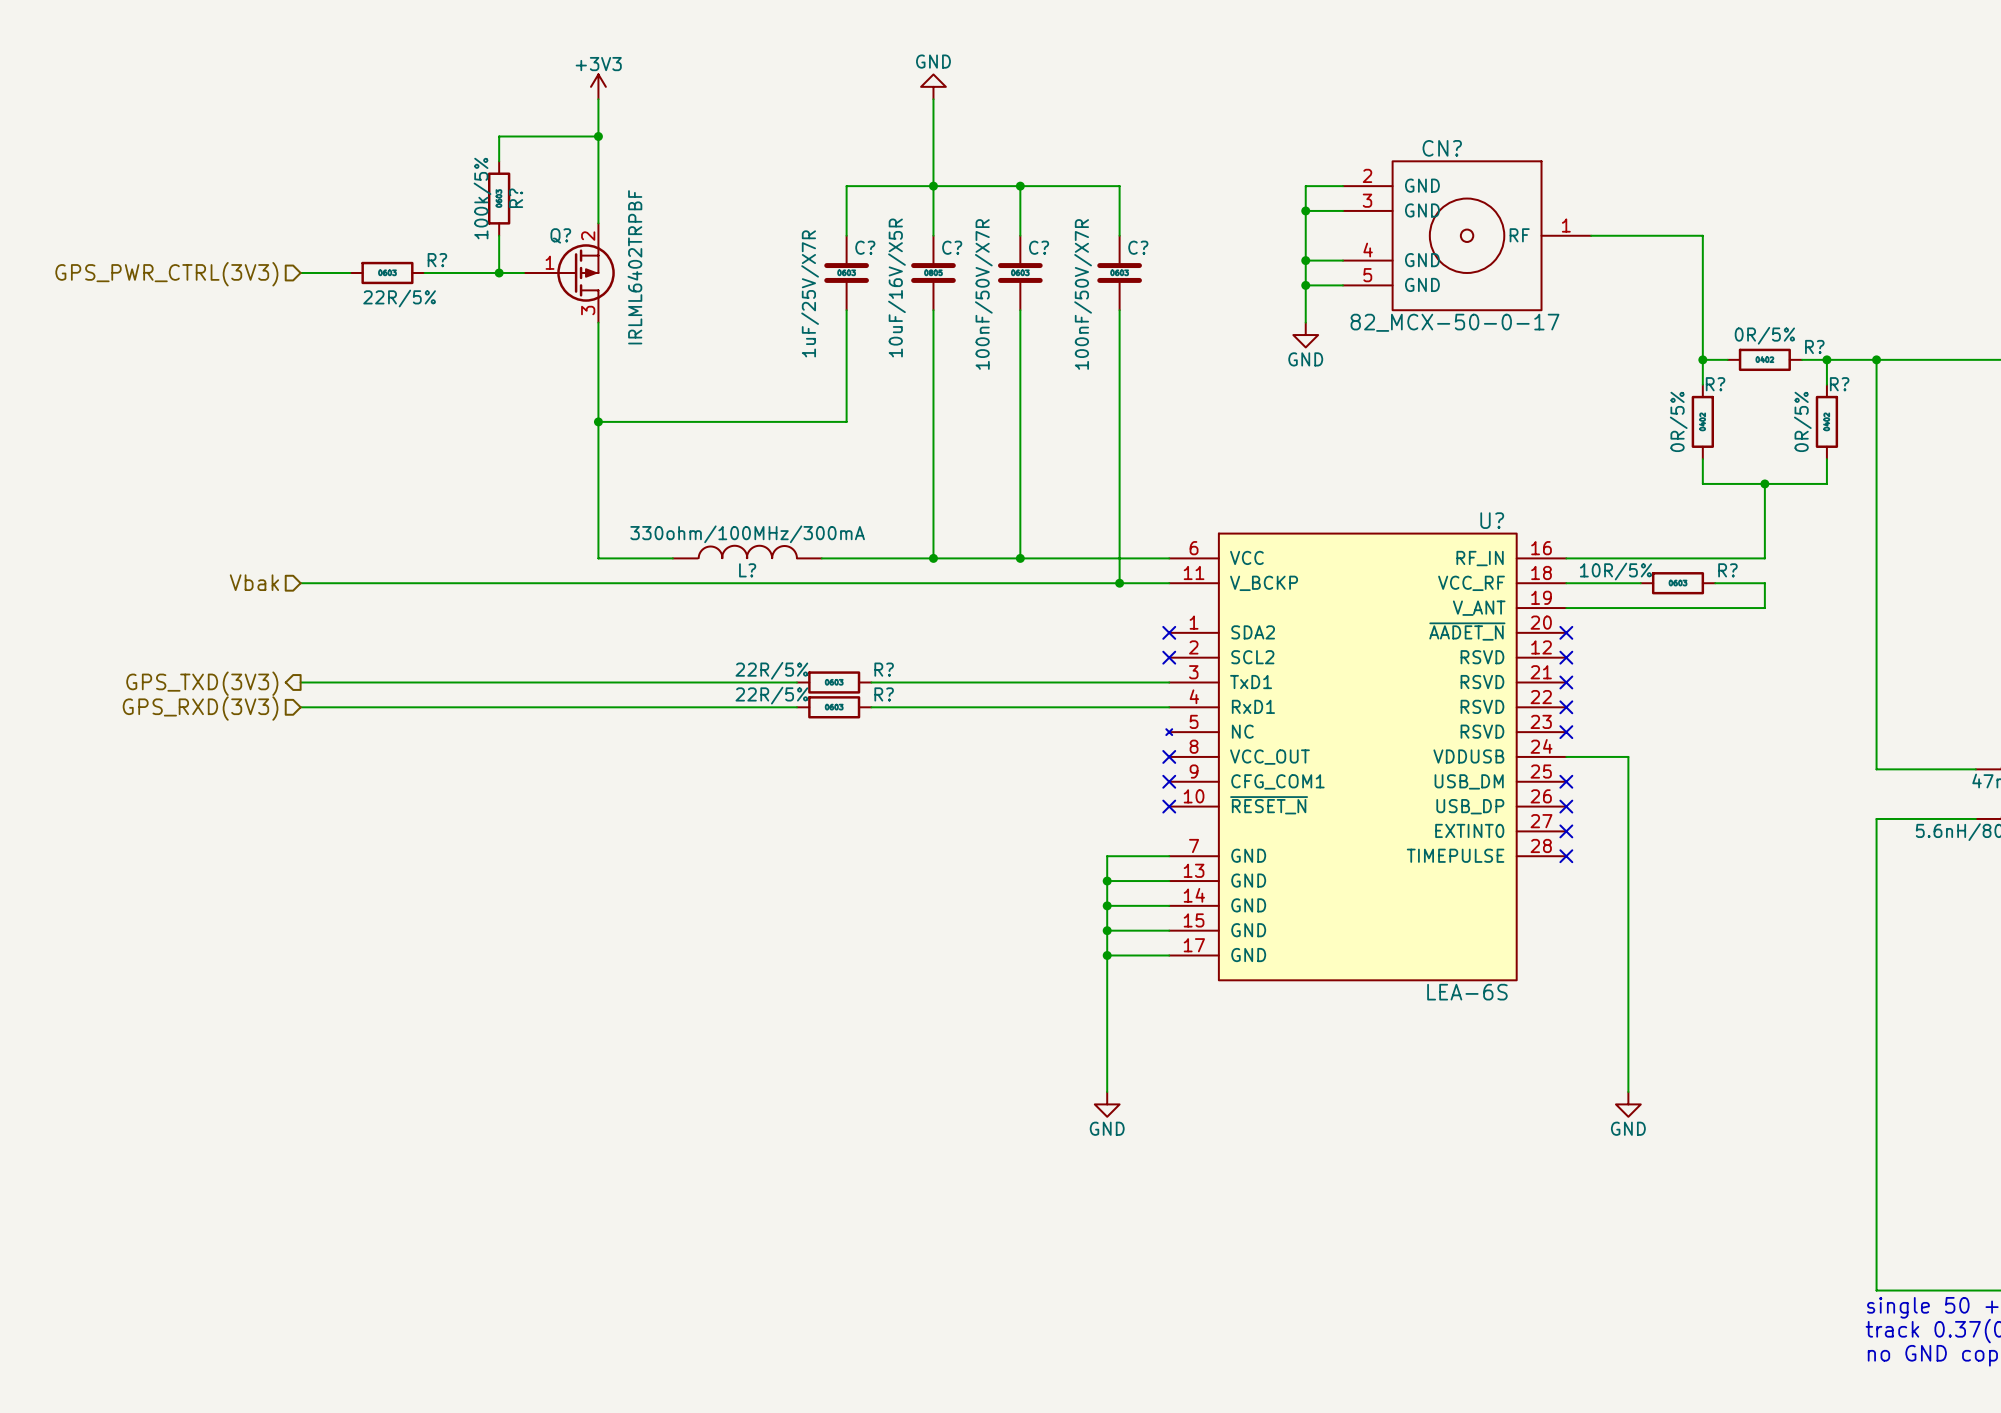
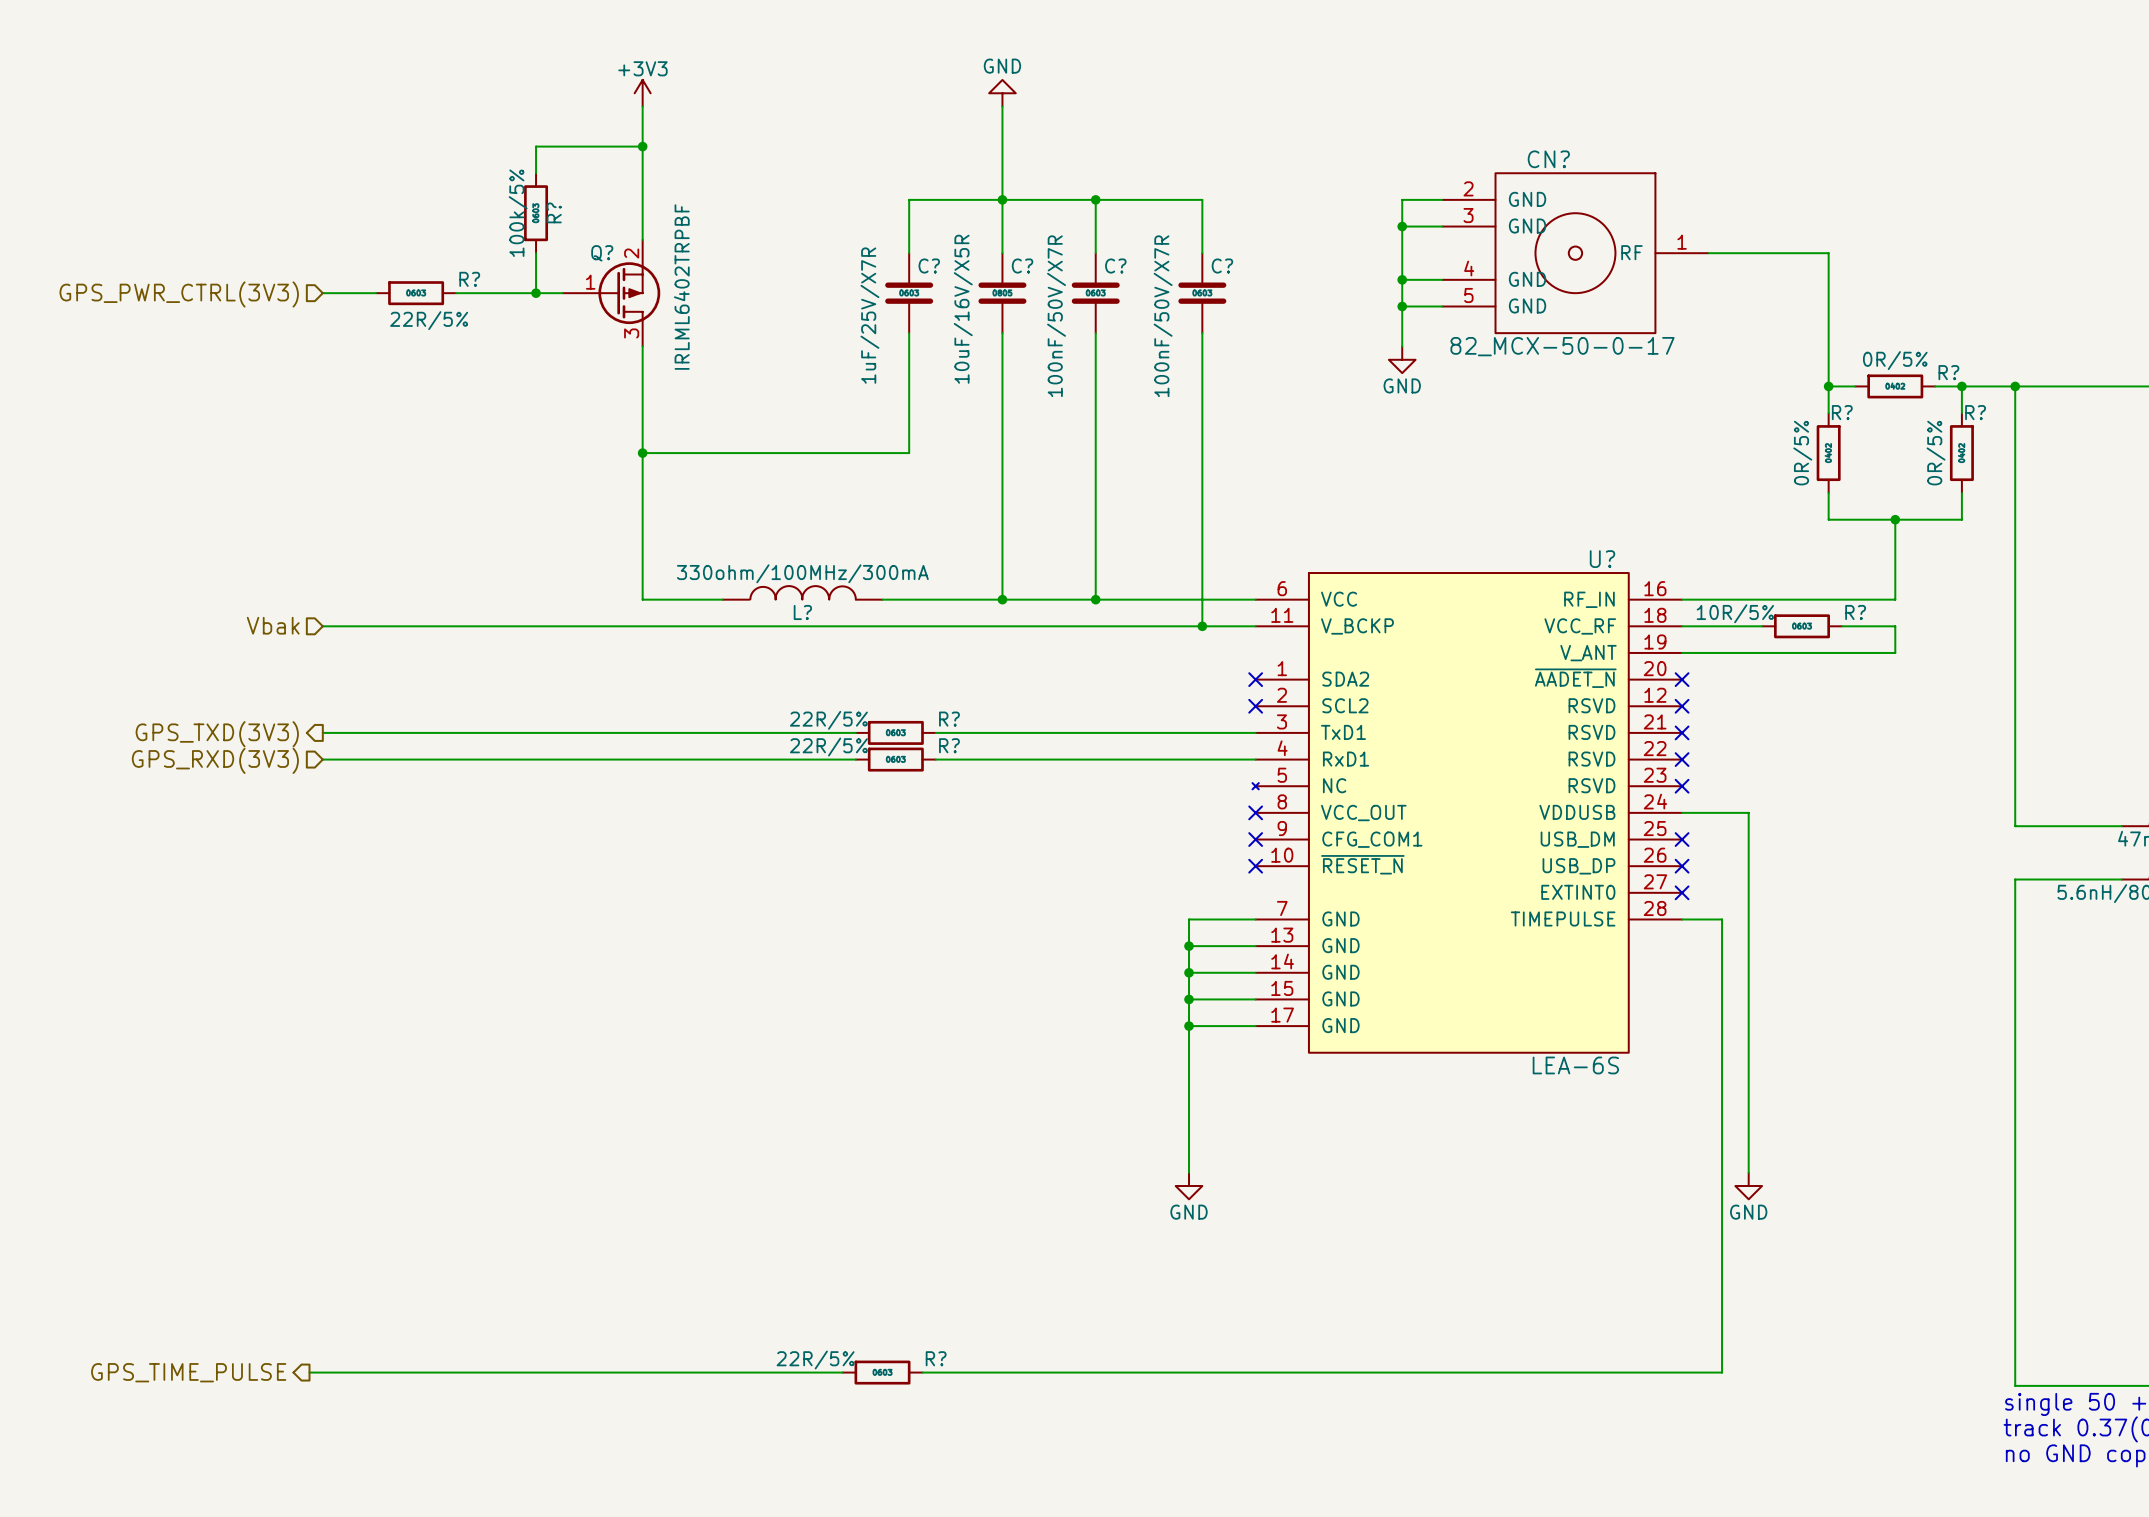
wire: none -> (1682, 919) (1722, 919) (1722, 1372) (922, 1372)
no-connect mark: (1566, 856) -> none
hierarchical label: none -> GPS_TIME_PULSE (188, 1372)
wire: none -> (309, 1372) (842, 1372)
R?: none -> 22R/5% (882, 1372)

